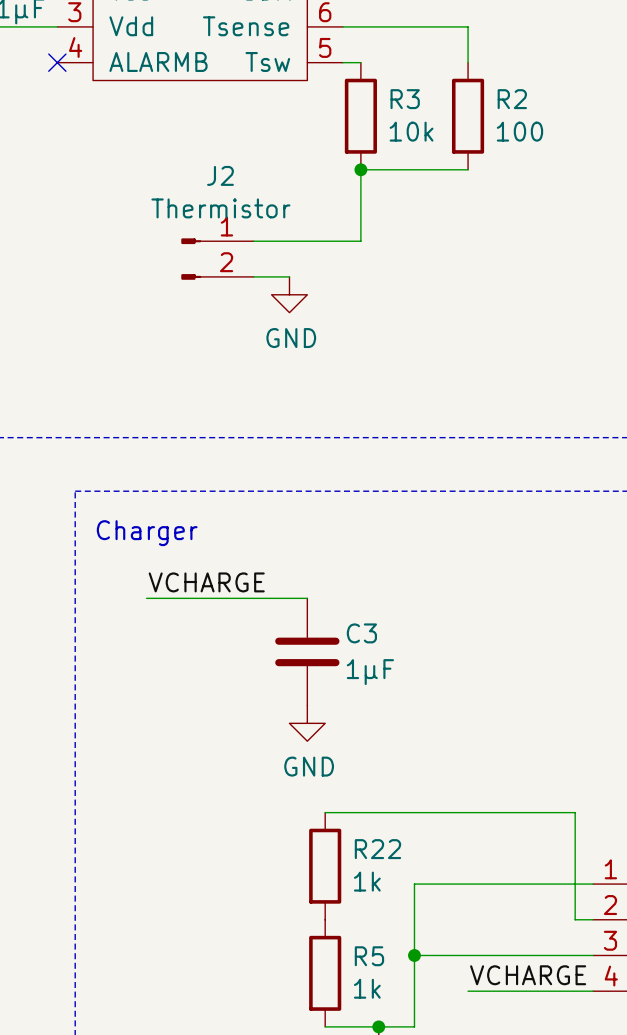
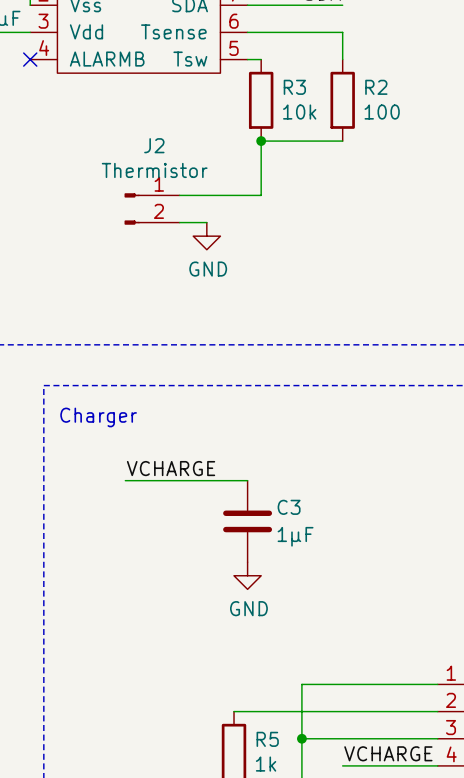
label position: VCHARGE (206, 582) -> VCHARGE (171, 468)
wire: (146, 598) (307, 598) -> (125, 480) (247, 480)
C3 position: (307, 651) -> (247, 521)
power symbol position: GND (307, 723) -> GND (247, 575)
wire: (325, 812) (575, 812) (575, 919) -> (234, 711) (424, 711)
R22: 1k (325, 866) -> none

